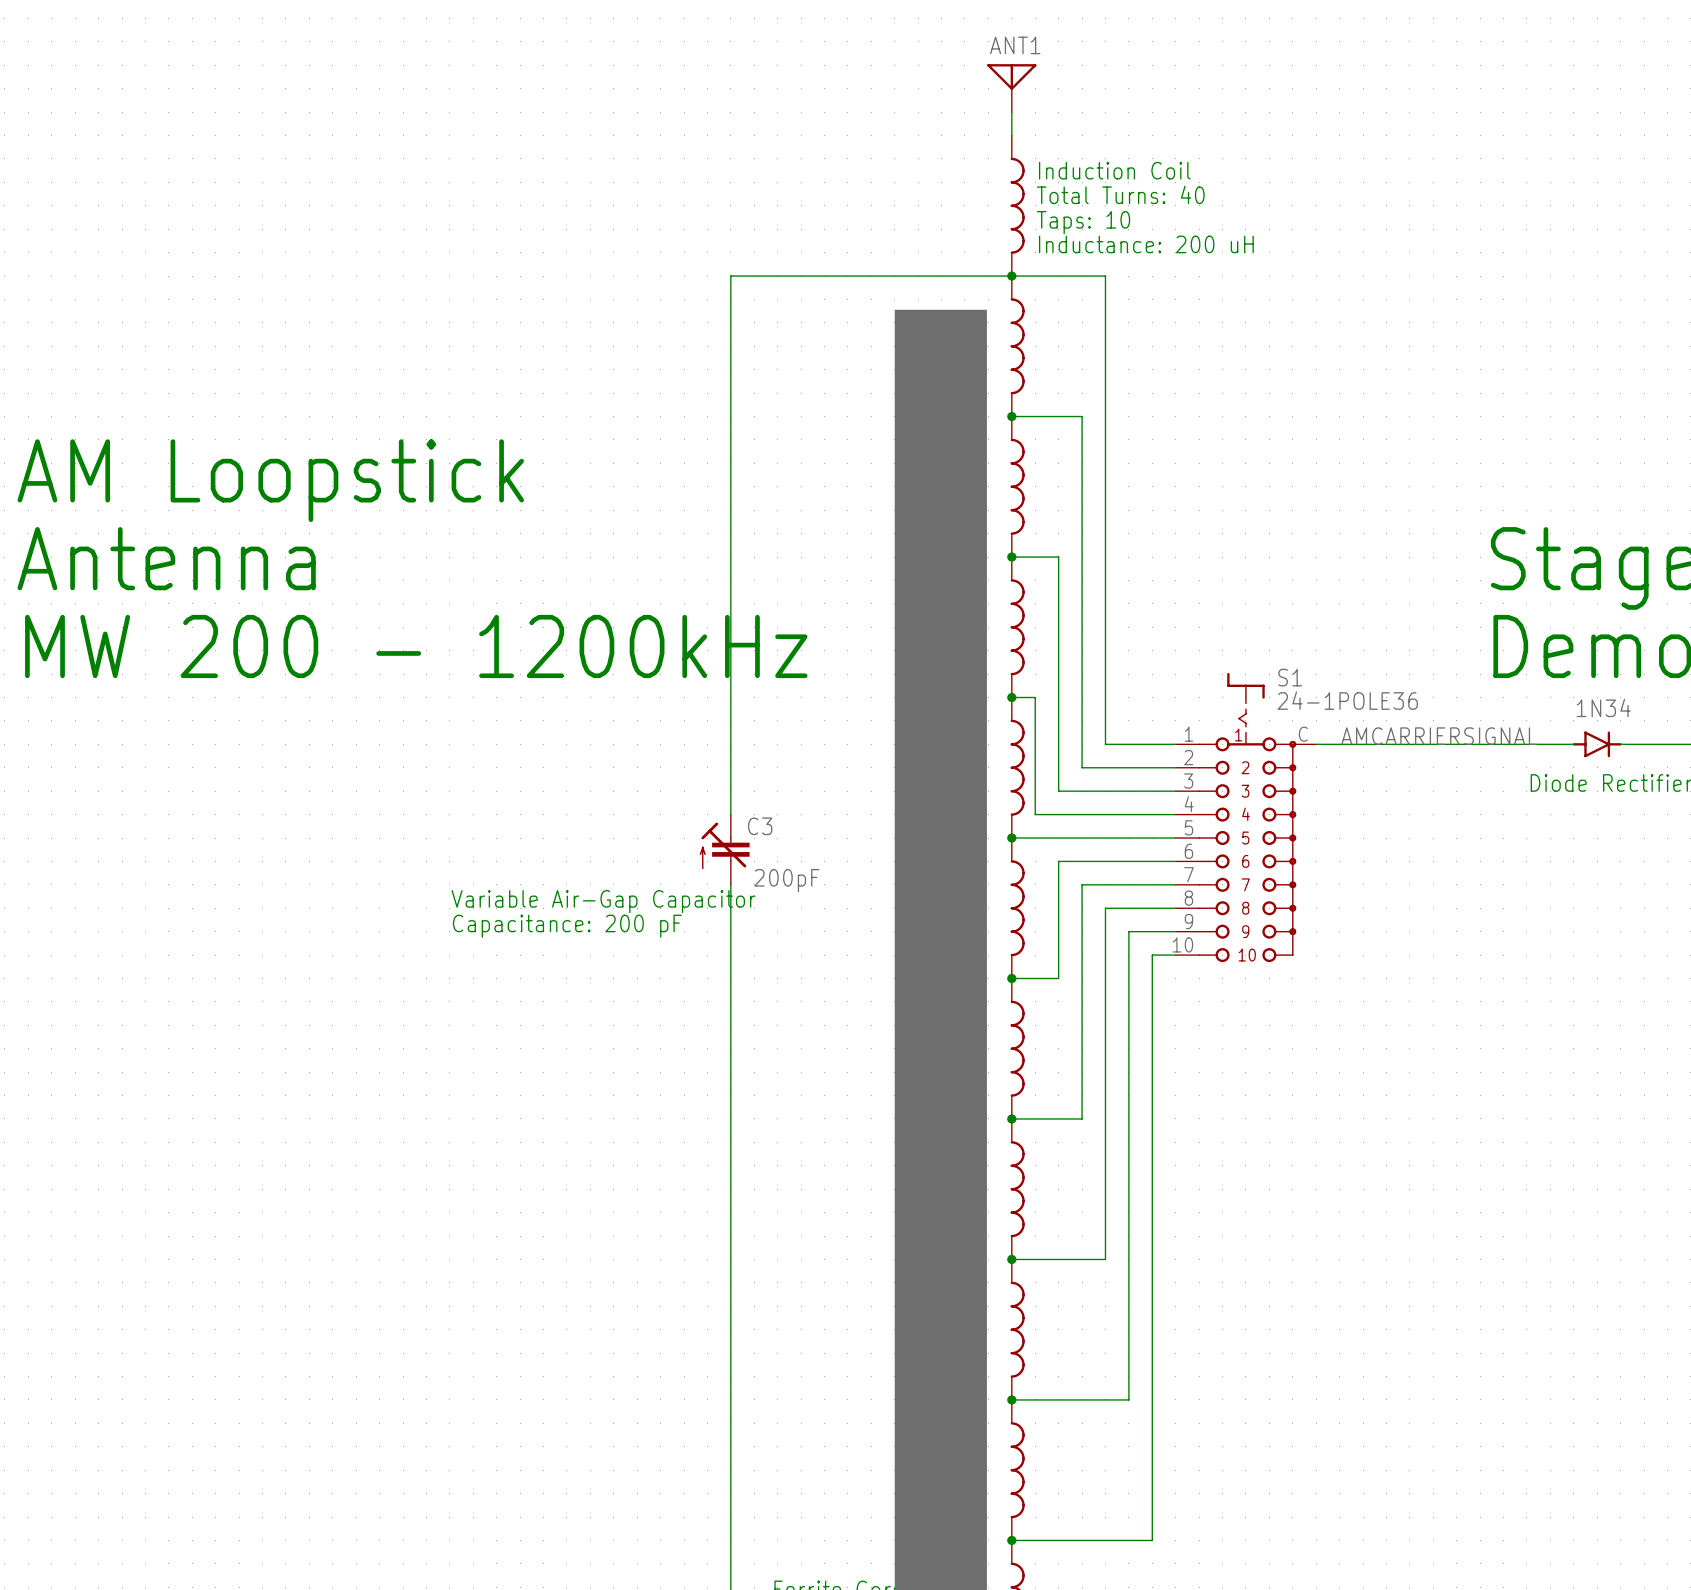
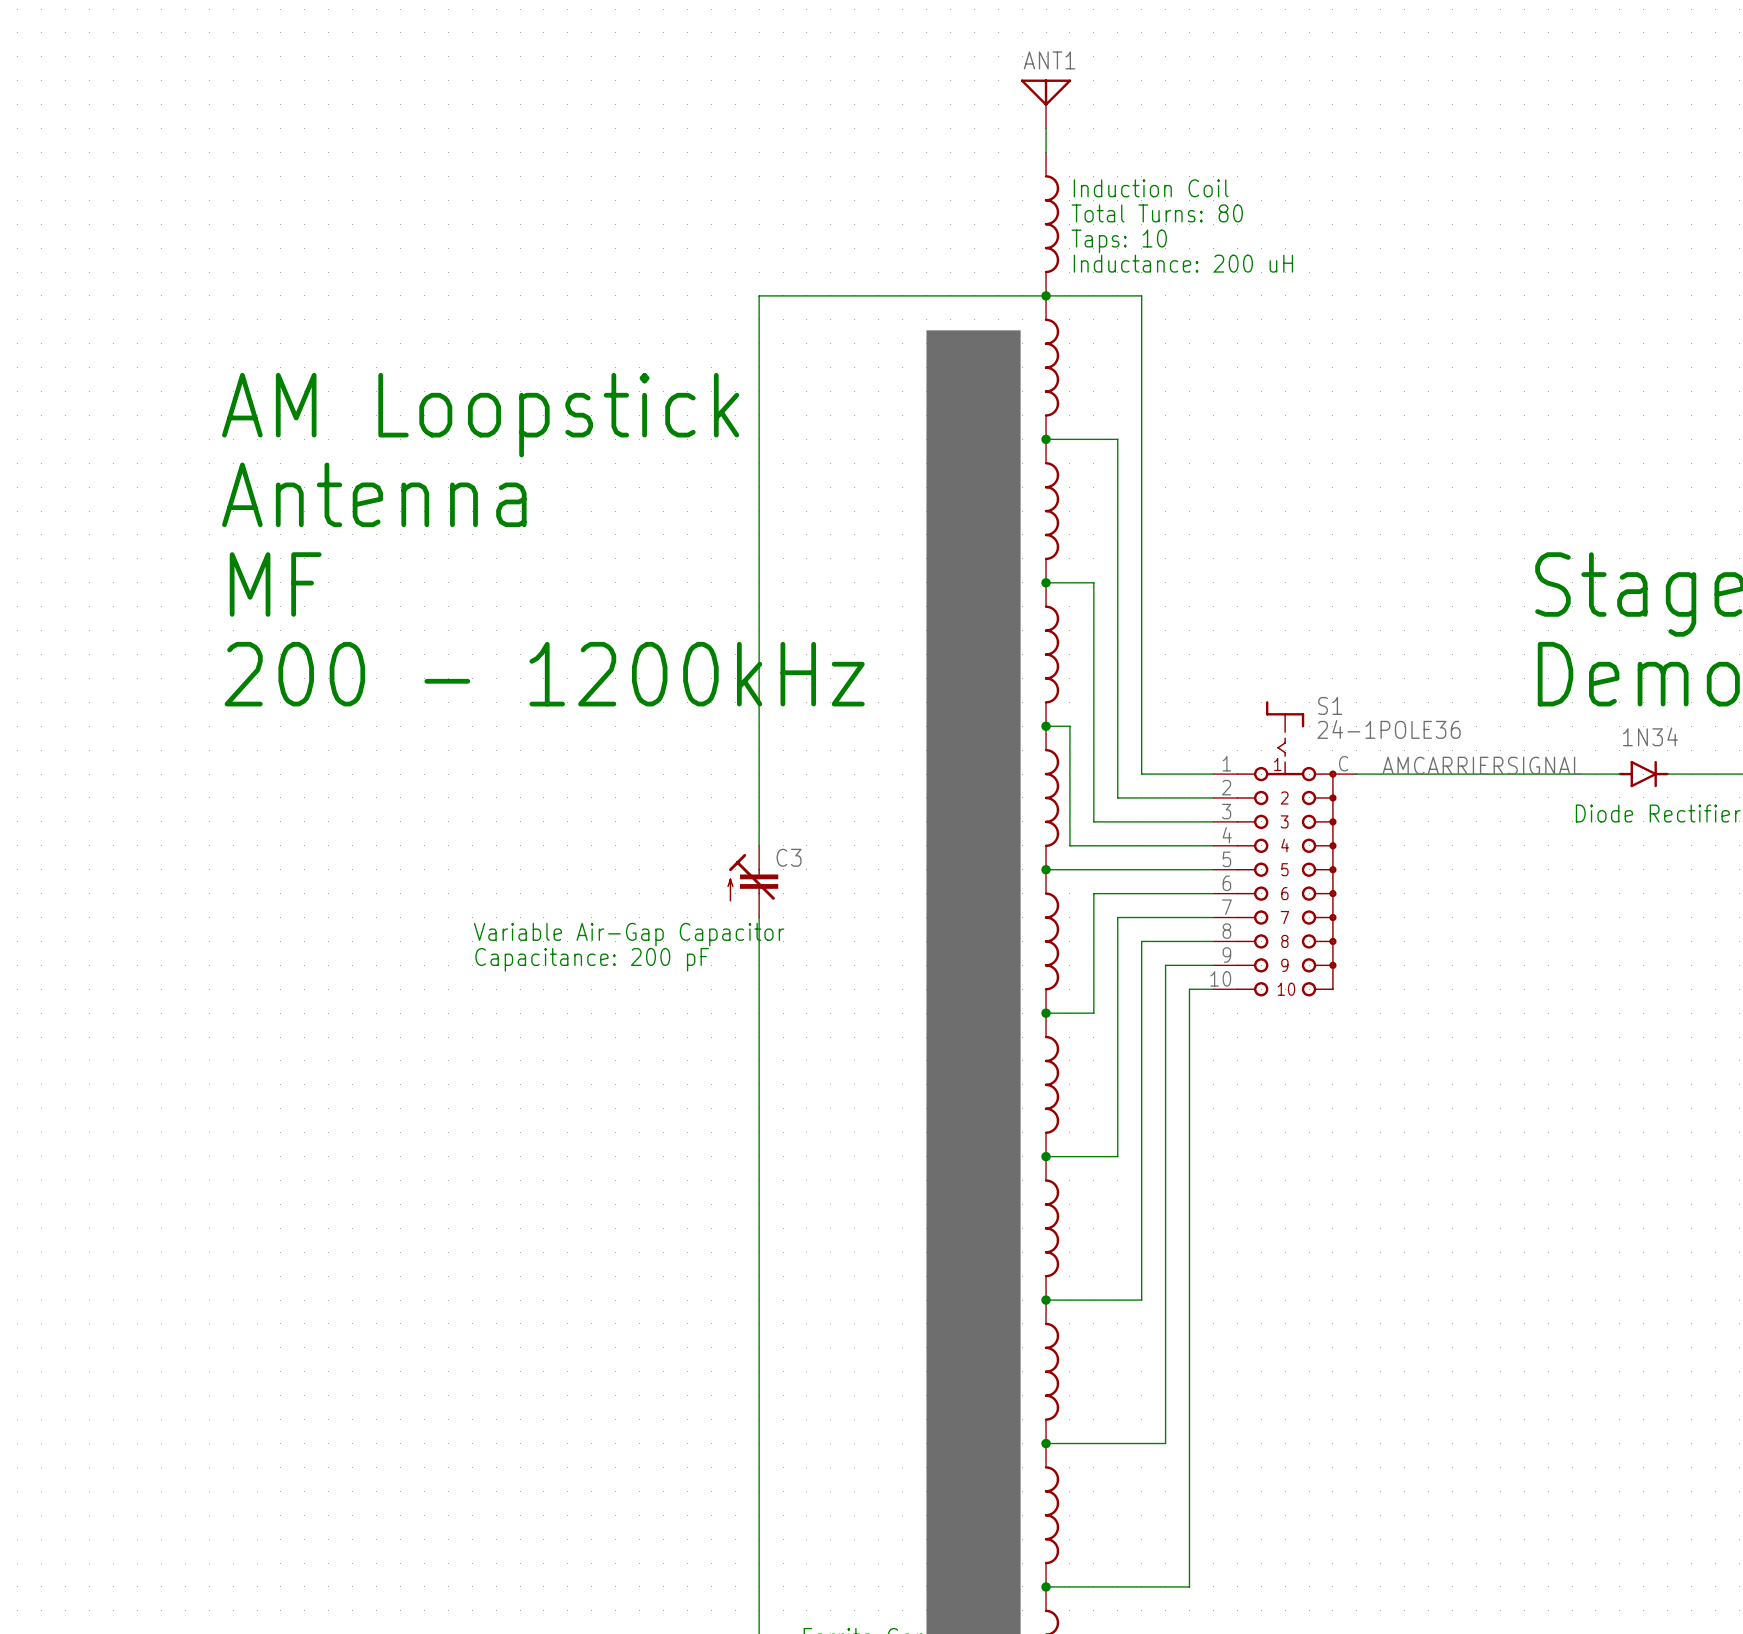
text: Total Turns: 40 (1120, 194) -> Total Turns: 80 (1157, 213)
text position: AM Loopstick (270, 480) -> AM Loopstick (480, 415)
text position: Antenna (166, 558) -> Antenna (374, 494)
text: none -> MF (275, 584)
text: MW 200 - 1200kHz (416, 646) -> 200 - 1200kHz (544, 674)
C3 value: 200pF (786, 880) -> none

